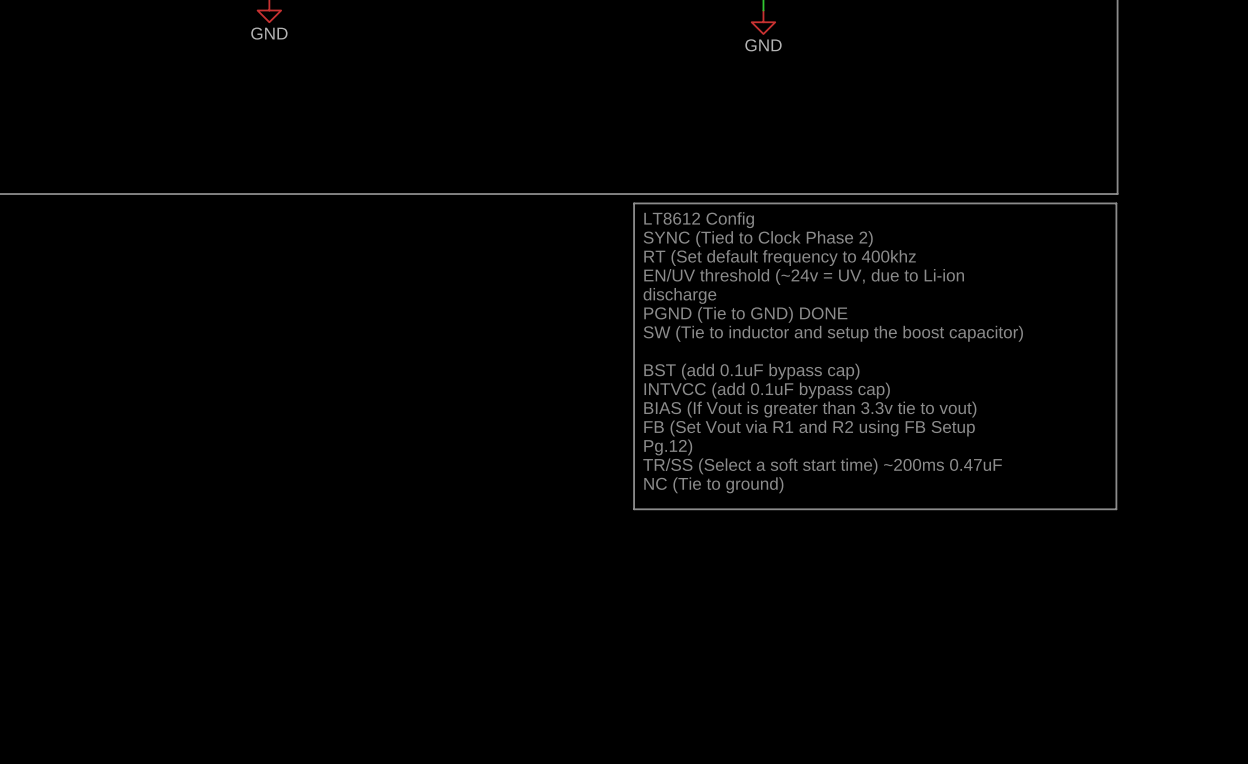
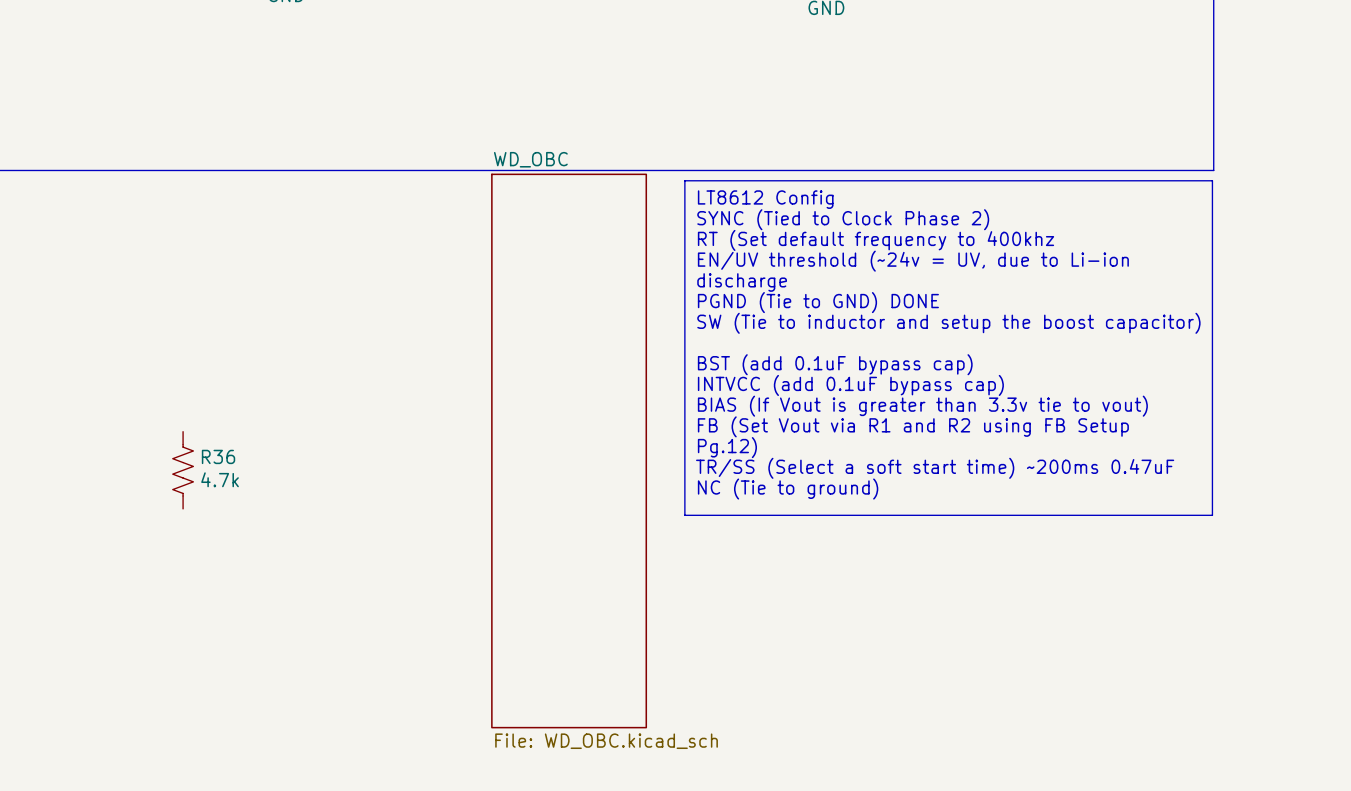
sheet WD_OBC: none -> File: WD_OBC.kicad_sch (569, 450)
R36: none -> 4.7k (183, 470)

